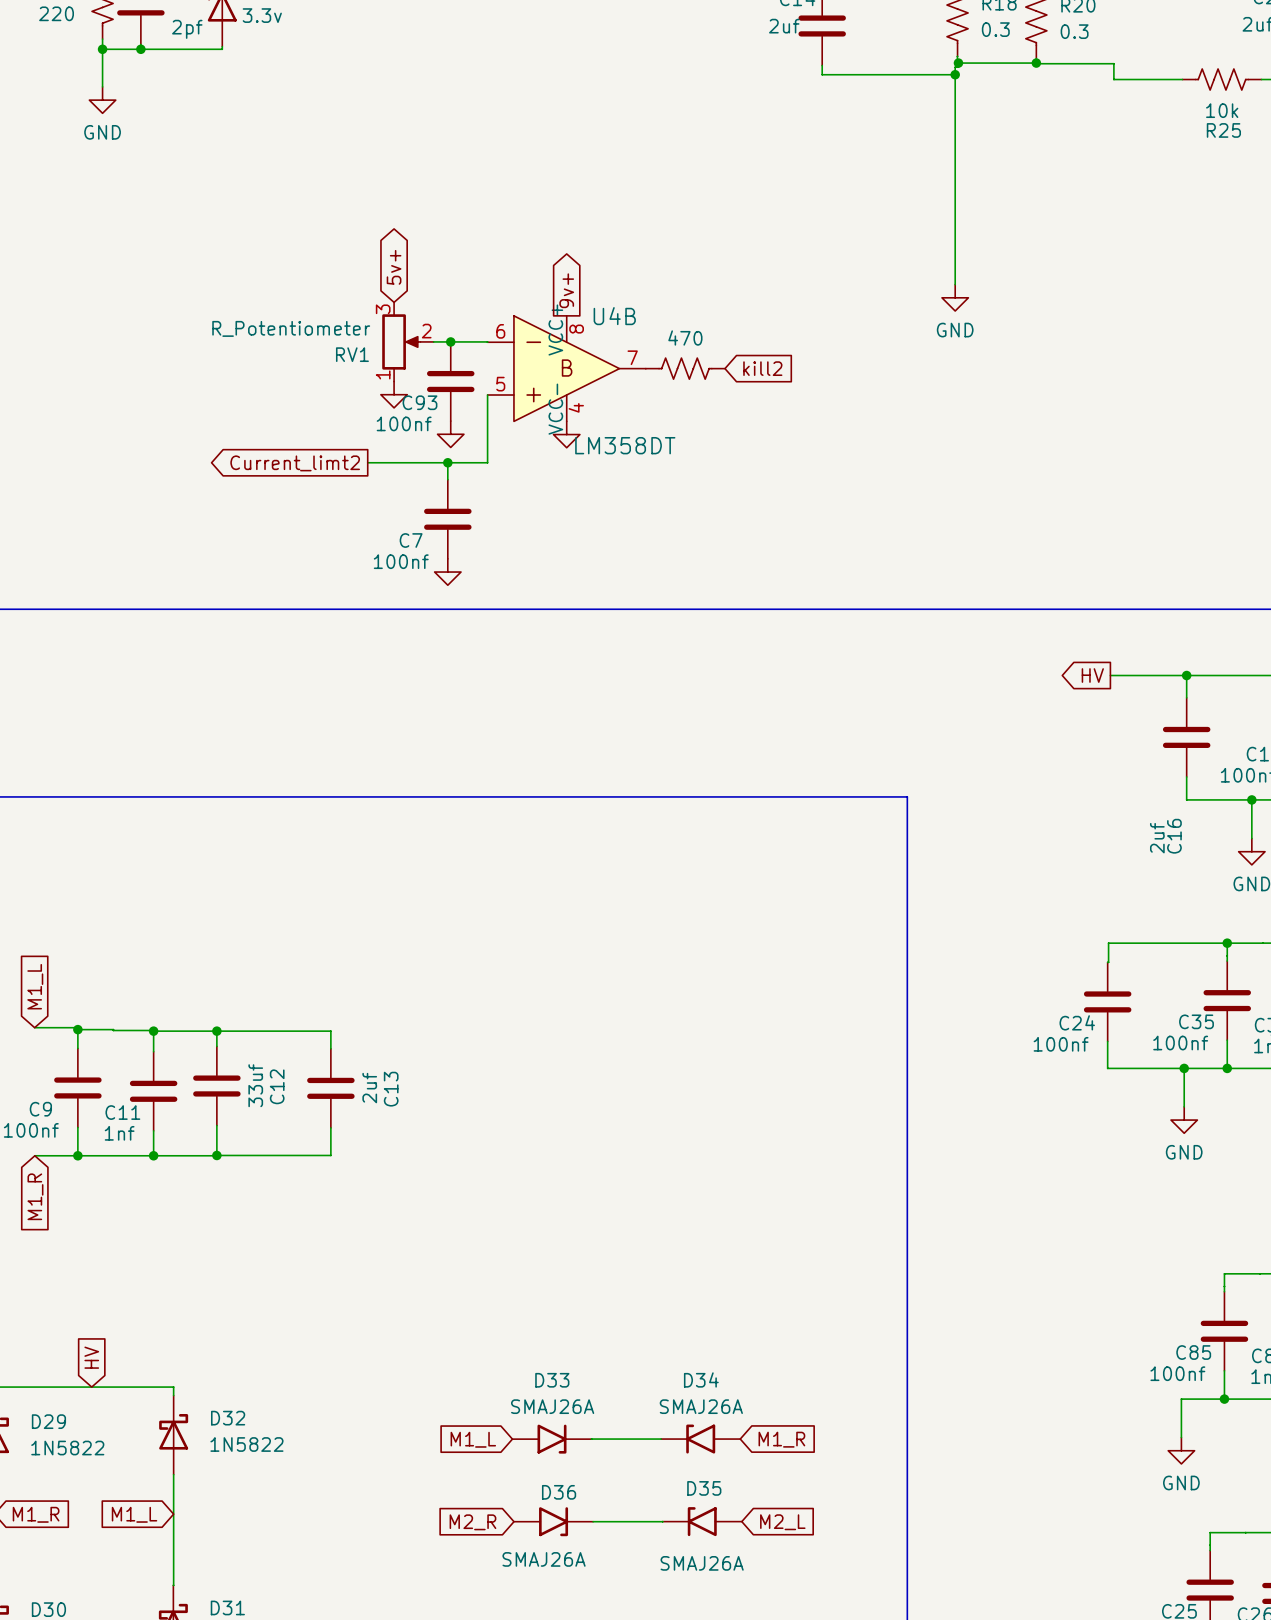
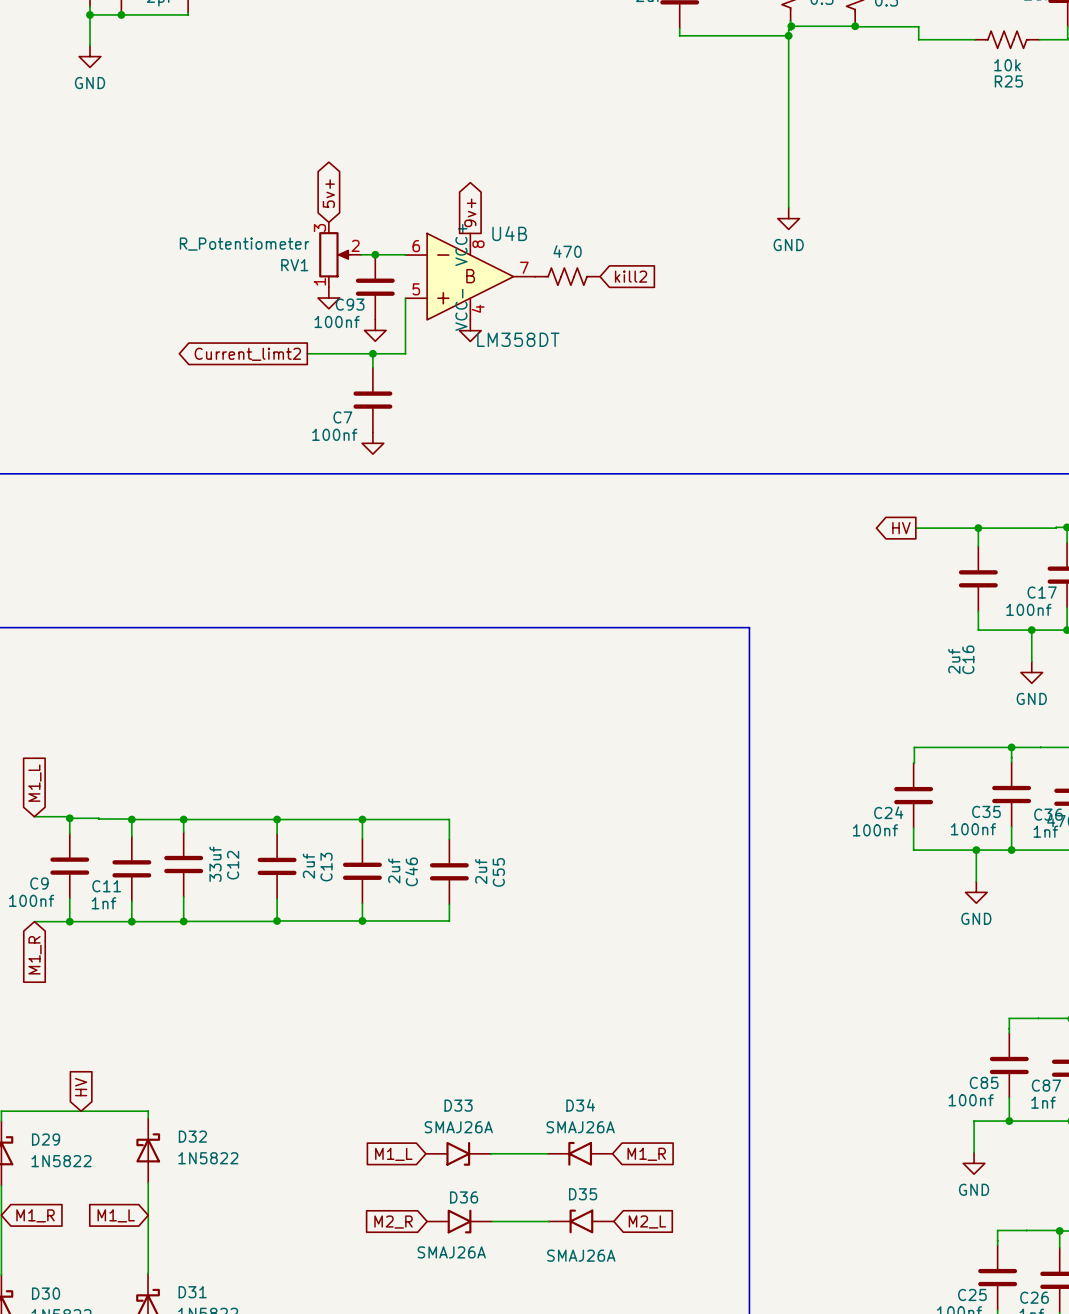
wire: none -> (277, 819) (449, 819) (449, 839)
junction: none -> (277, 819)
wire: none -> (362, 819) (362, 838)
junction: none -> (362, 819)
C46: none -> 2uf (362, 871)
C55: none -> 2uf (449, 871)
wire: none -> (362, 903) (362, 920)
wire: none -> (449, 904) (449, 920) (277, 920)
junction: none -> (277, 920)
junction: none -> (362, 920)

